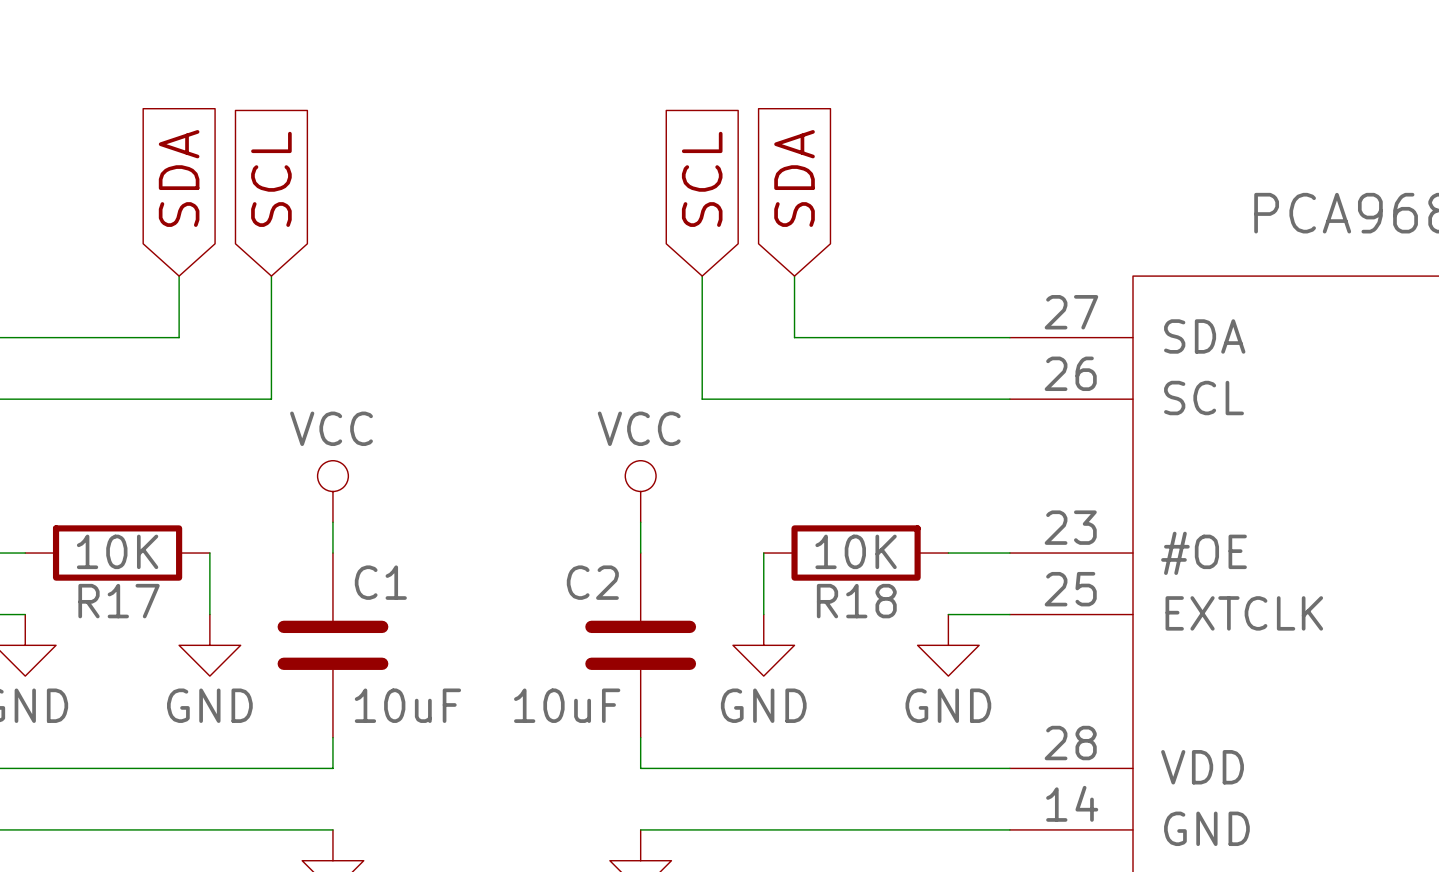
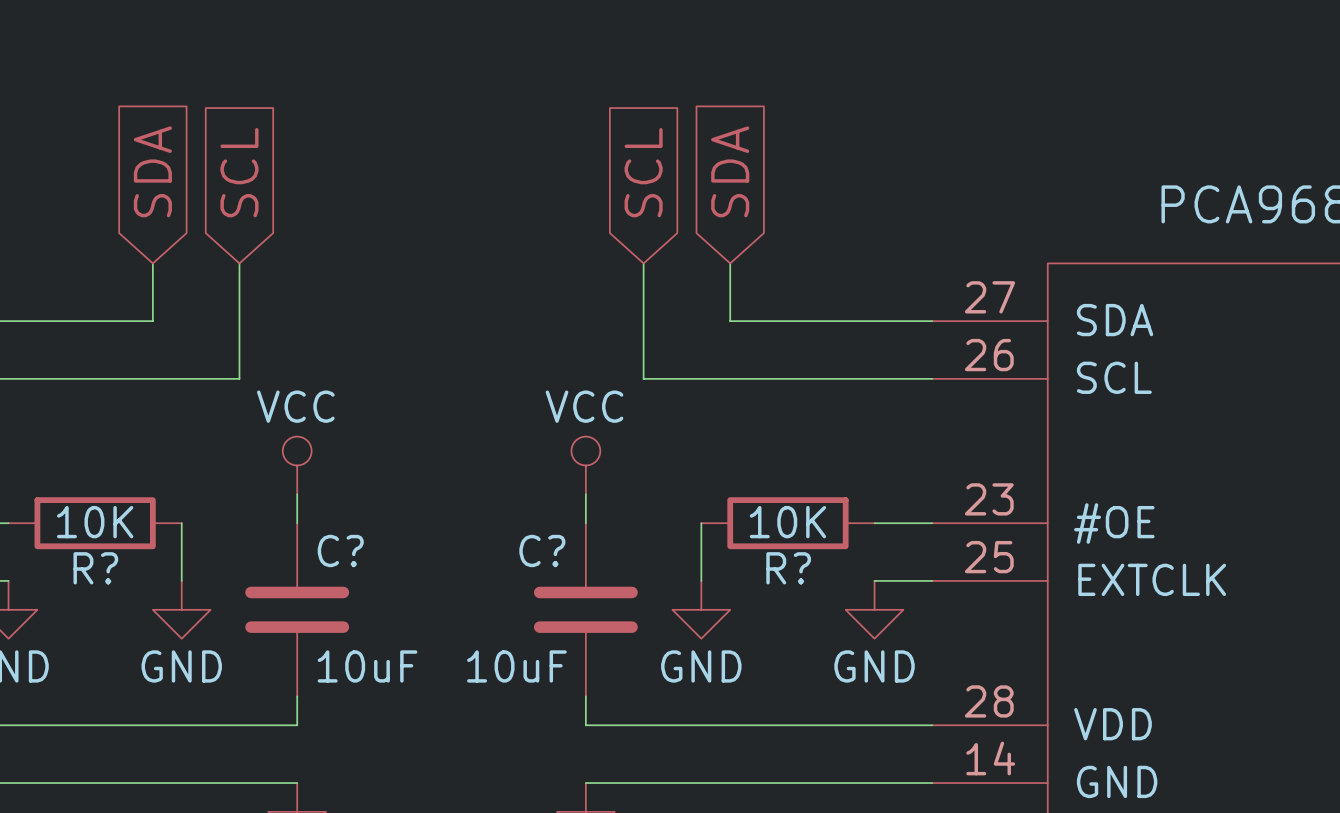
C1 name: C1 (380, 582) -> C? (340, 551)
C2 name: C2 (592, 582) -> C? (542, 551)
R17 name: R17 (119, 601) -> R? (95, 568)
R18 name: R18 (856, 601) -> R? (788, 568)

